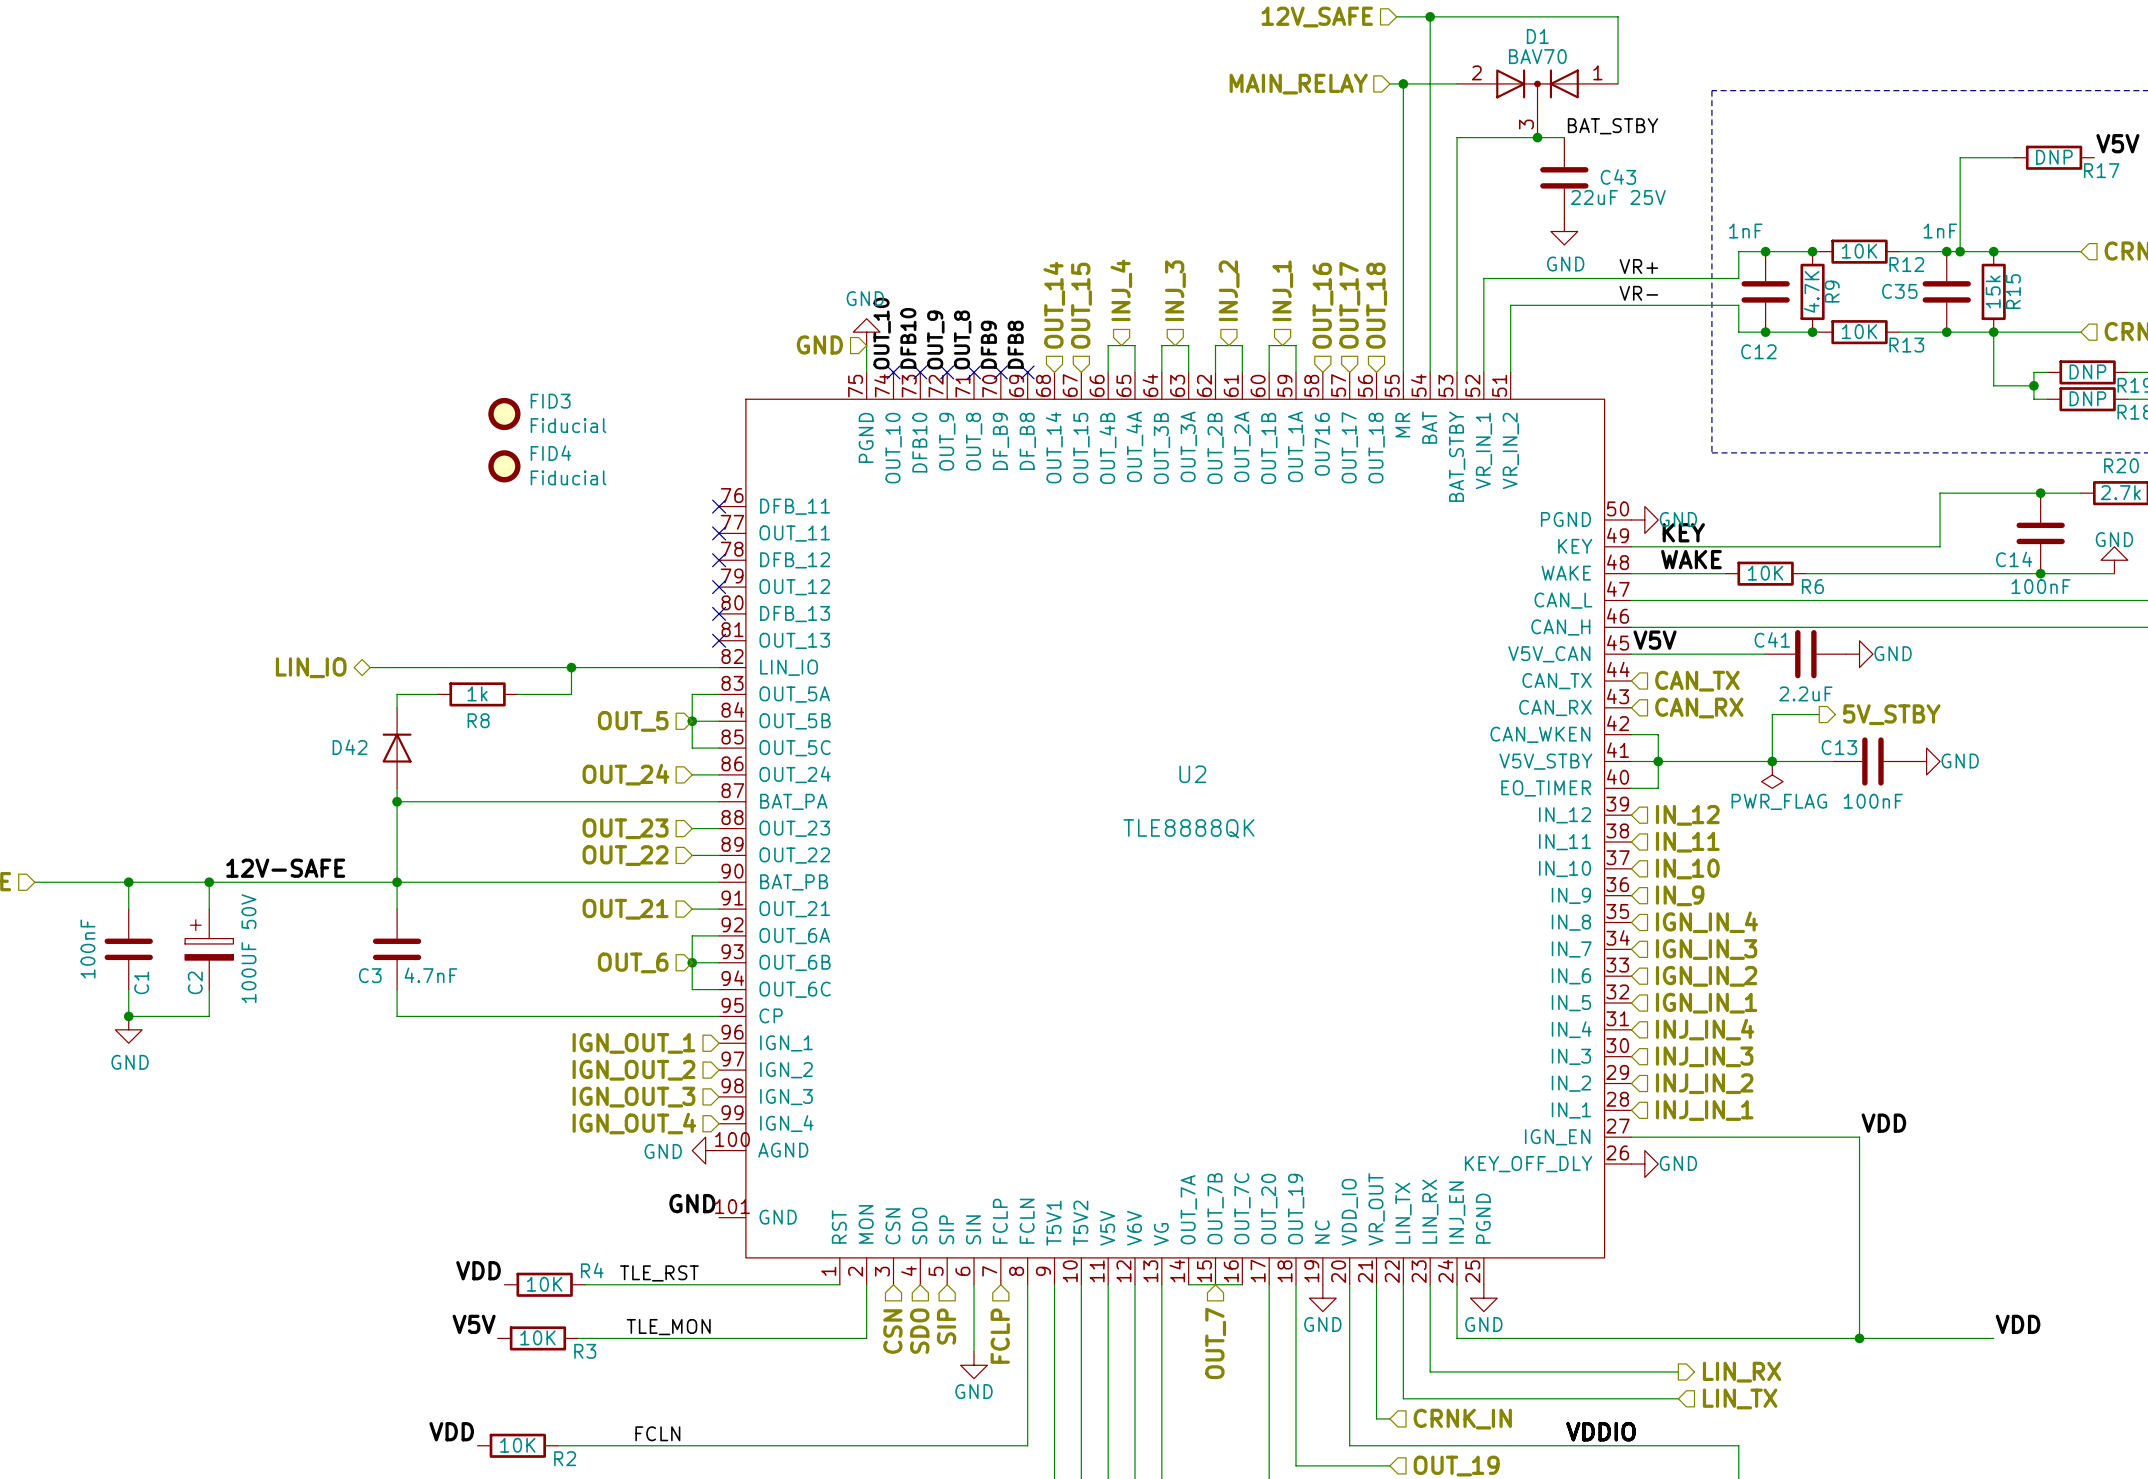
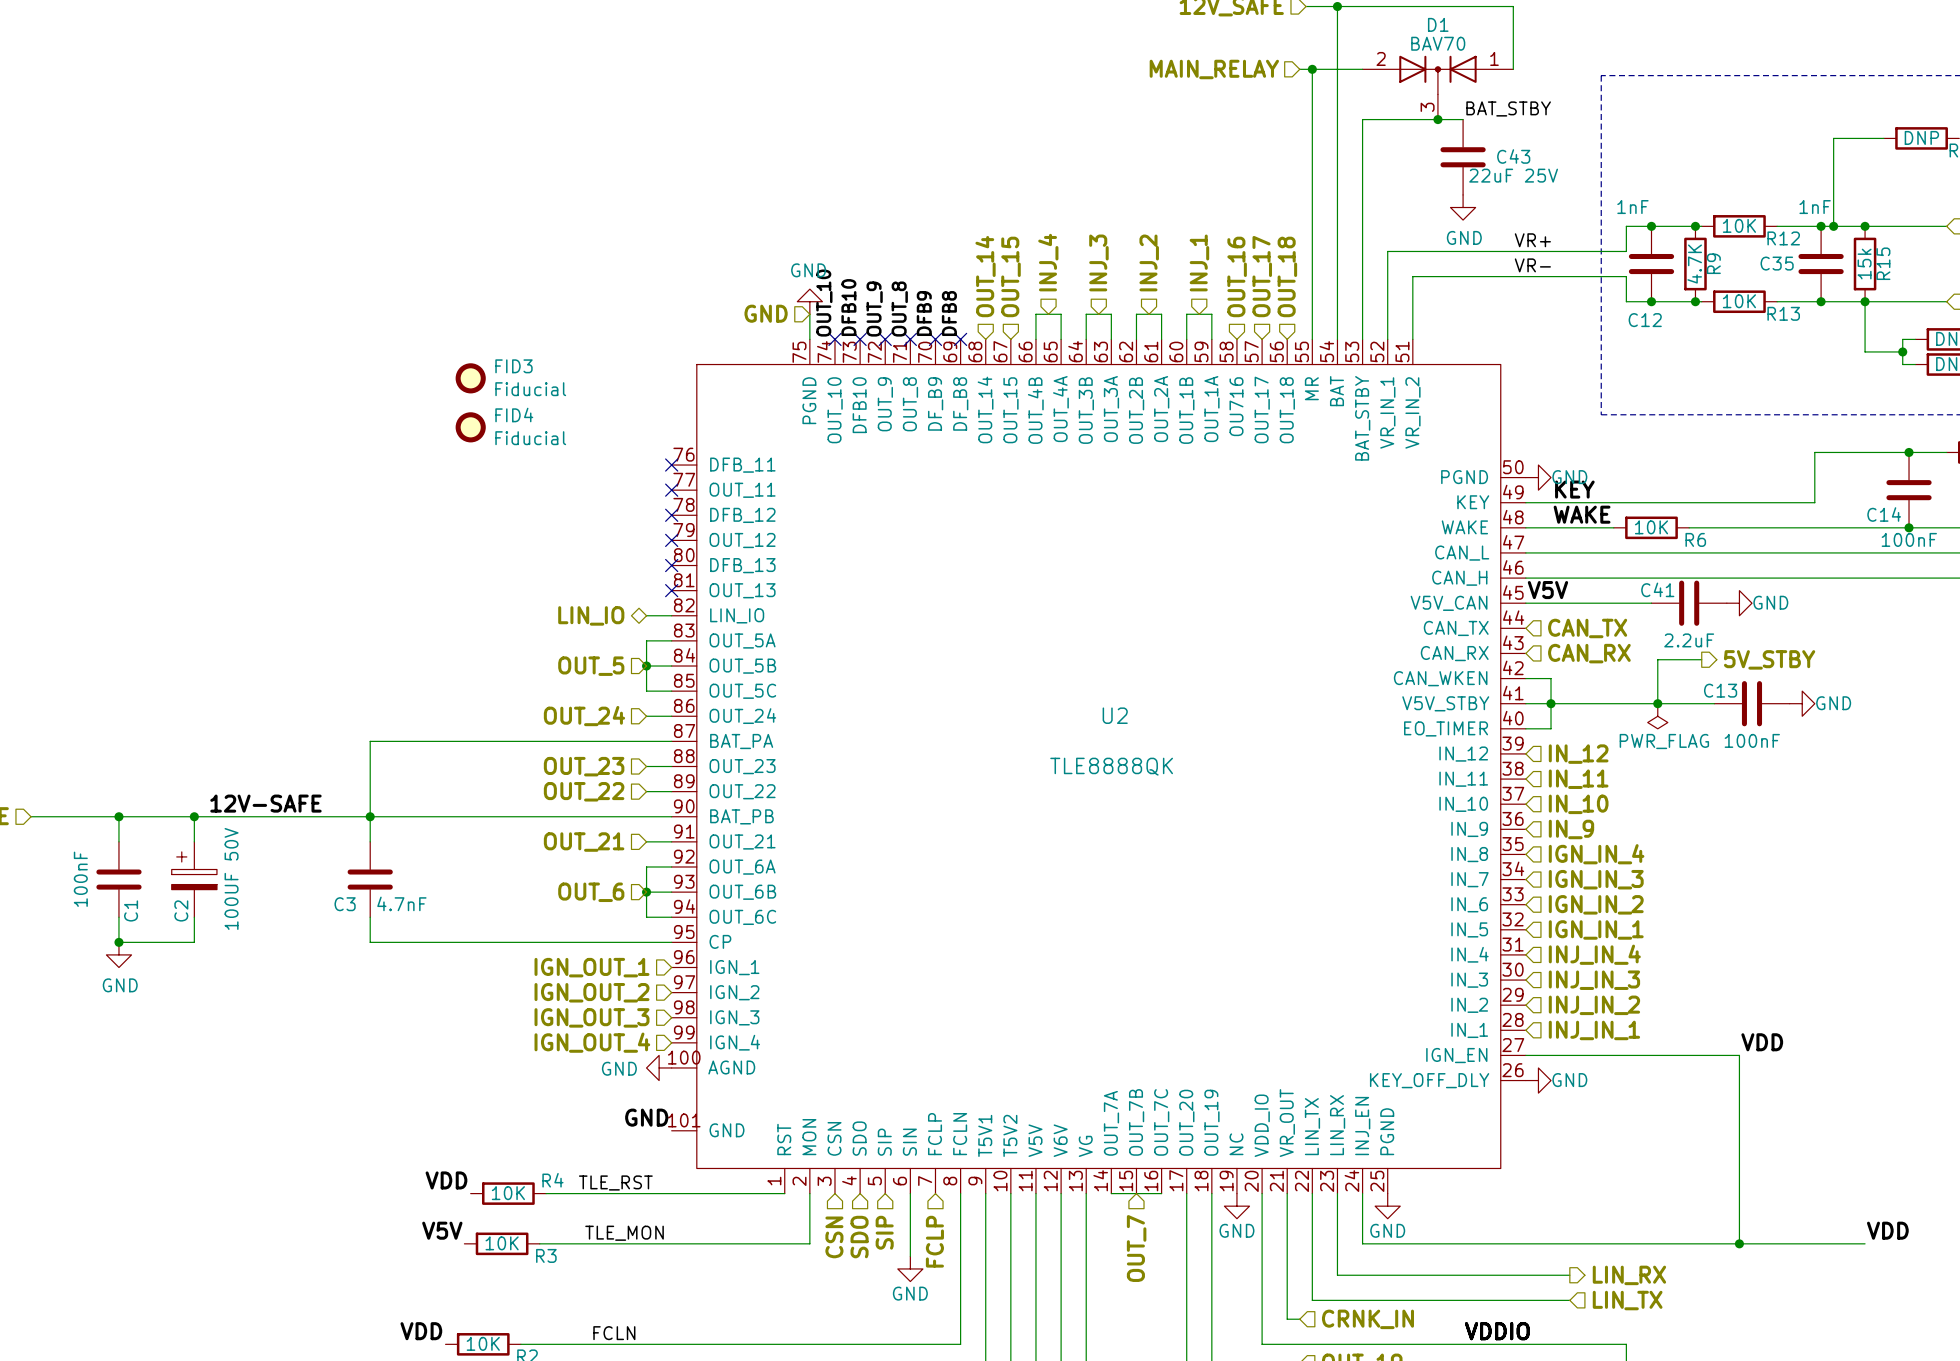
hierarchical label: LIN_IO (311, 667) -> none
wire: (370, 667) (692, 667) -> none
wire: (571, 667) (571, 694) (517, 694) -> none
junction: (571, 667) -> none
hierarchical label: none -> LIN_IO (591, 615)
wire: (437, 694) (397, 694) (397, 707) -> none
R8: 1k (477, 694) -> none
D42: (397, 748) -> none
wire: (397, 788) (397, 801) -> none
junction: (397, 801) -> none

